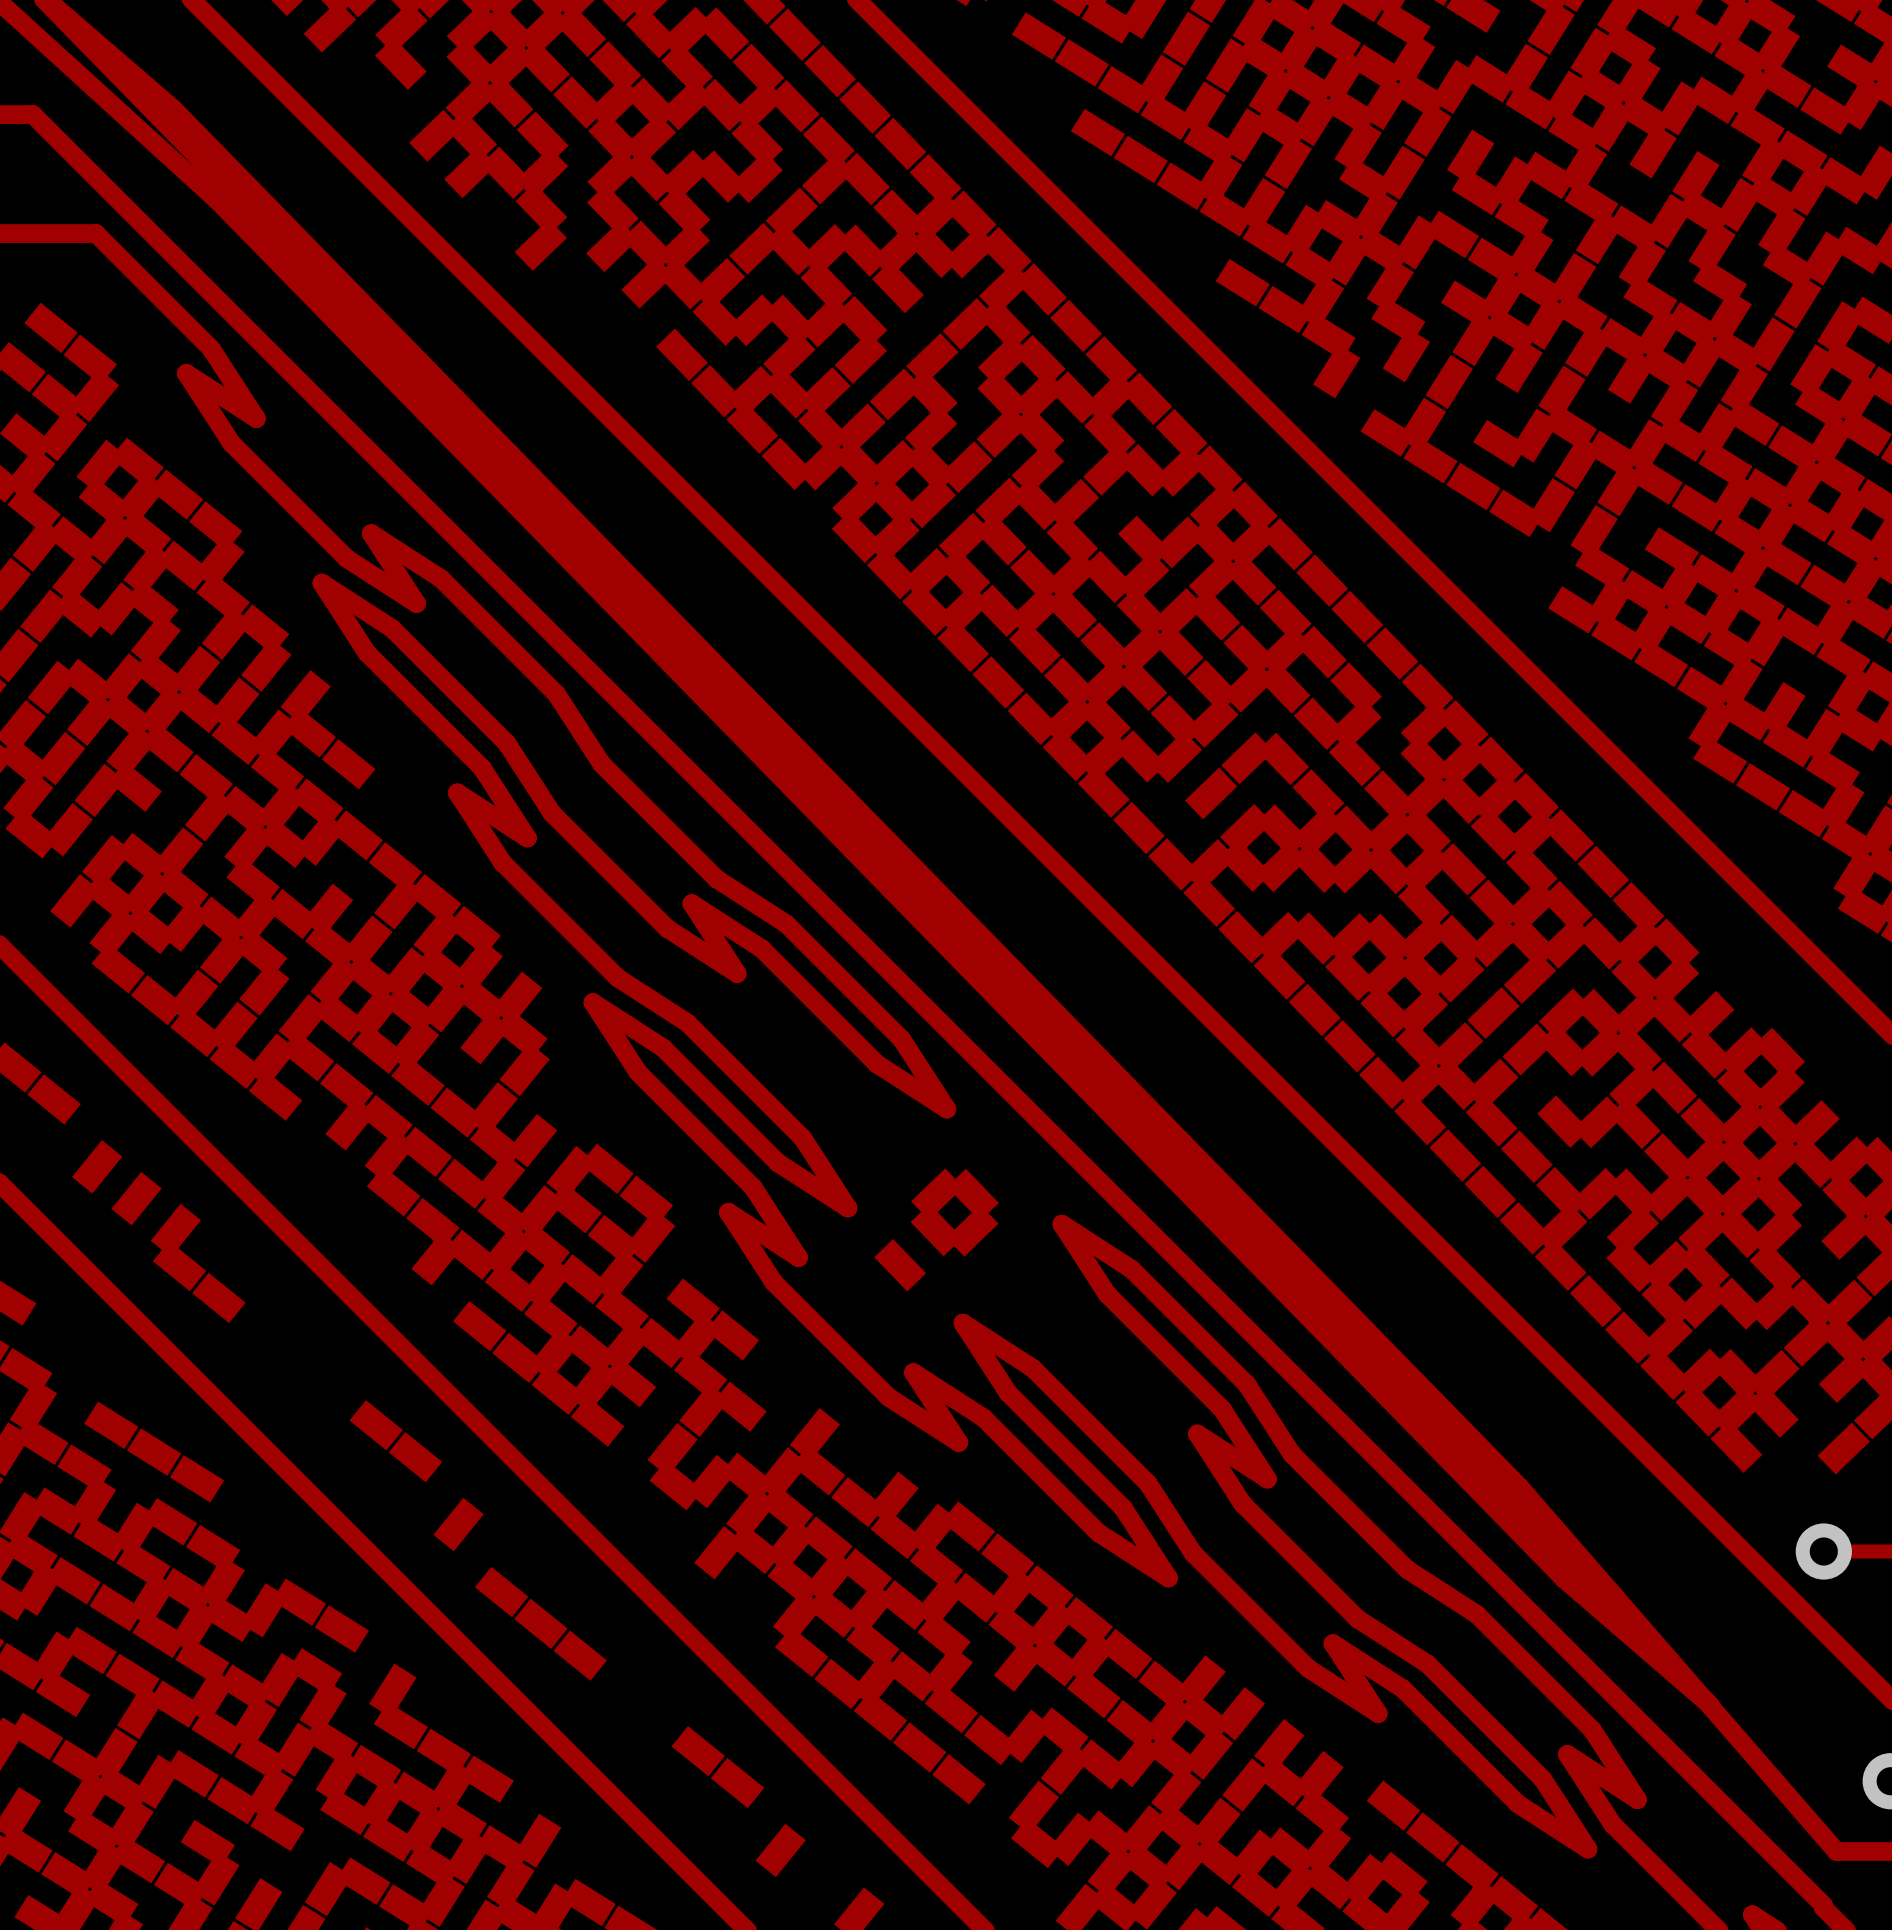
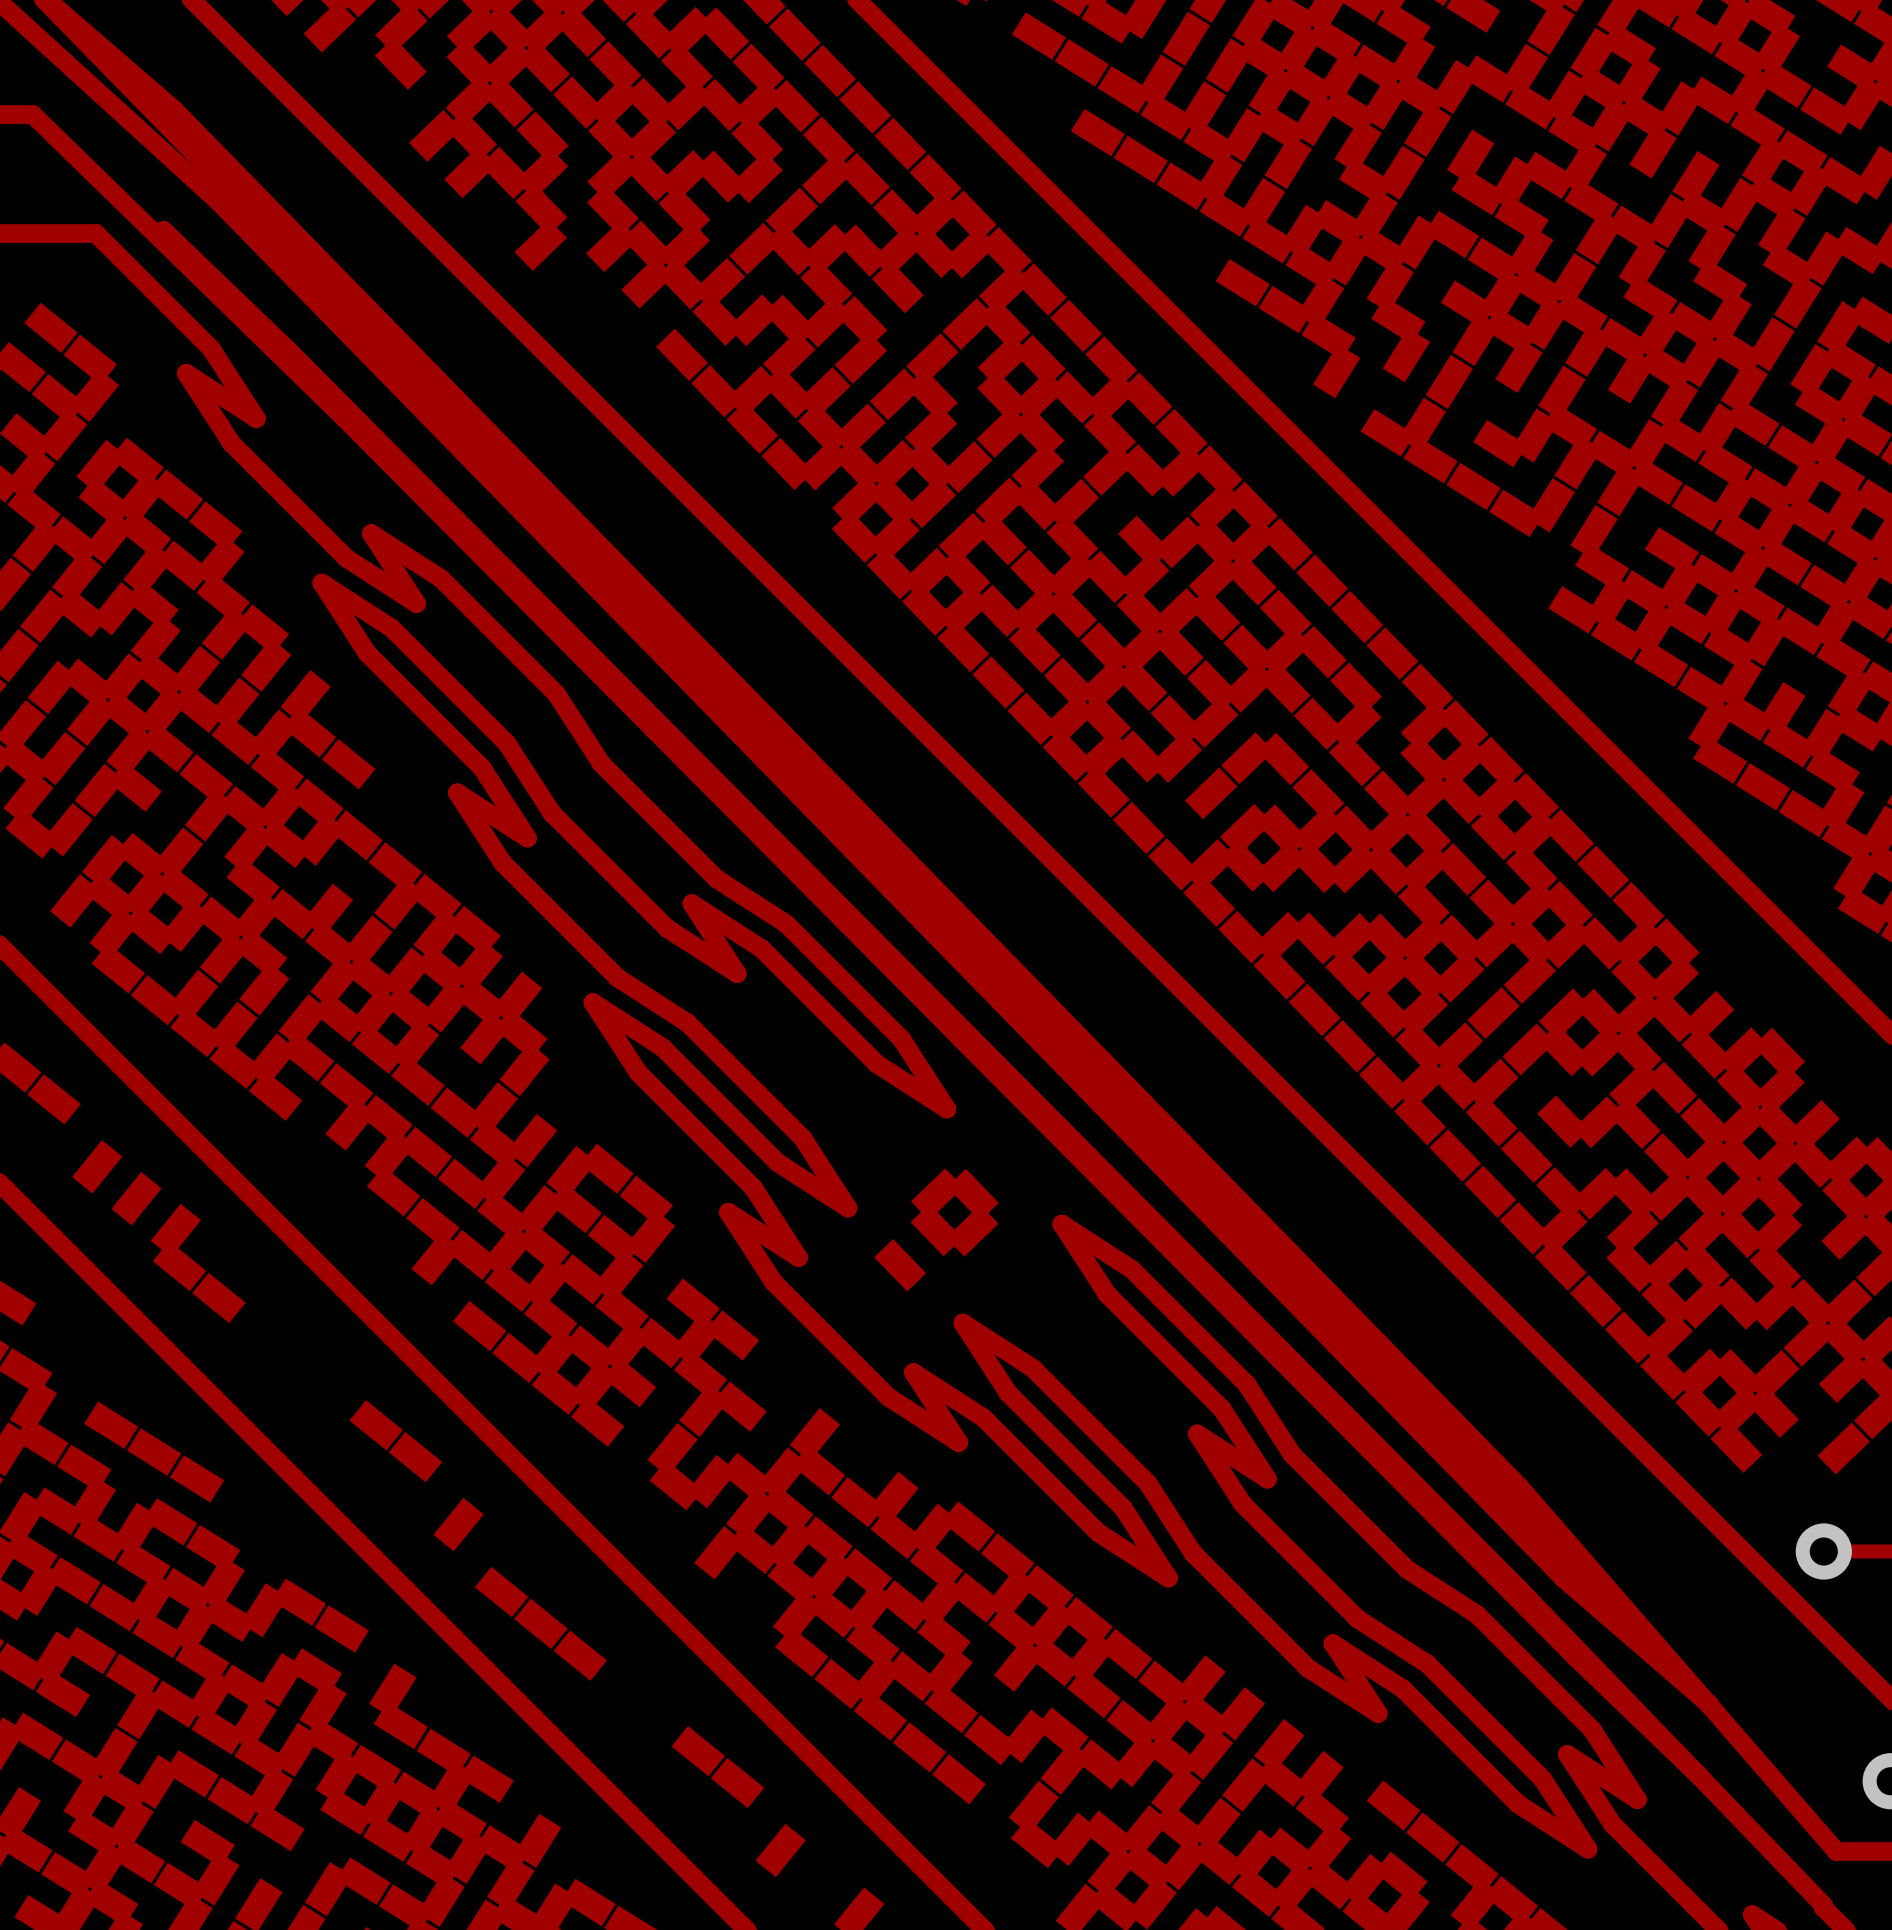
track: (32, 114) (1823, 1905) -> (32, 114) (345, 419) (1576, 1658) (1702, 1779) (163, 230) (289, 351) (1520, 1590) (1823, 1905)

